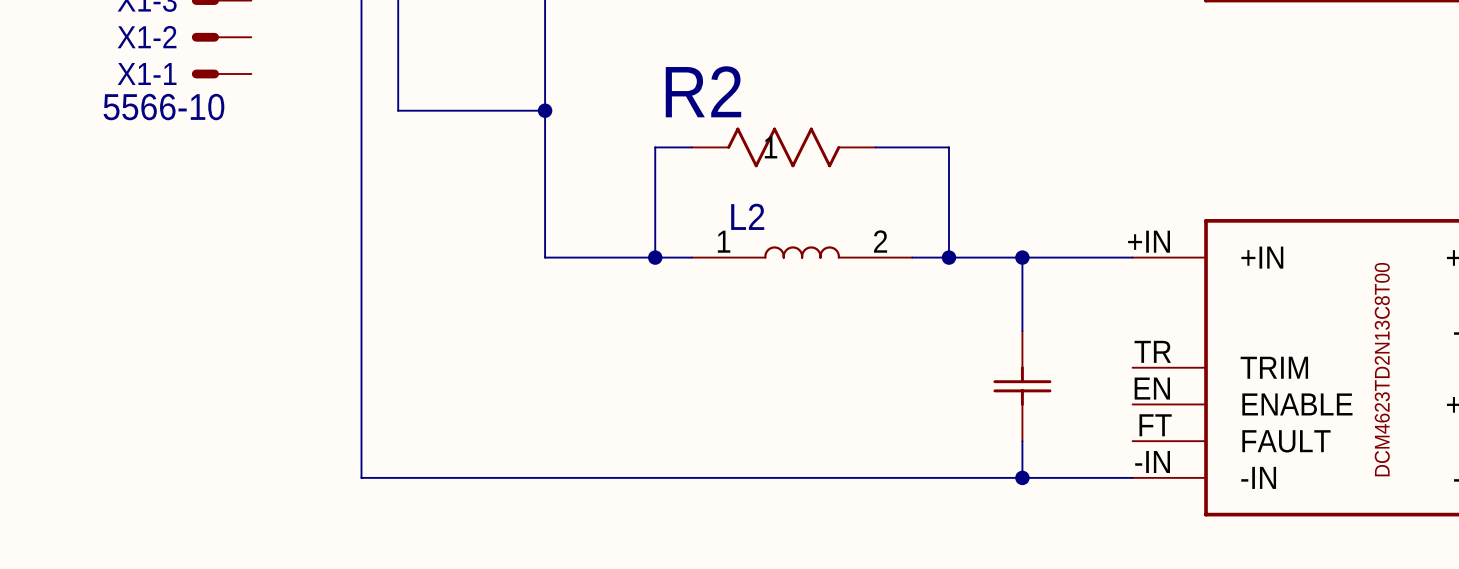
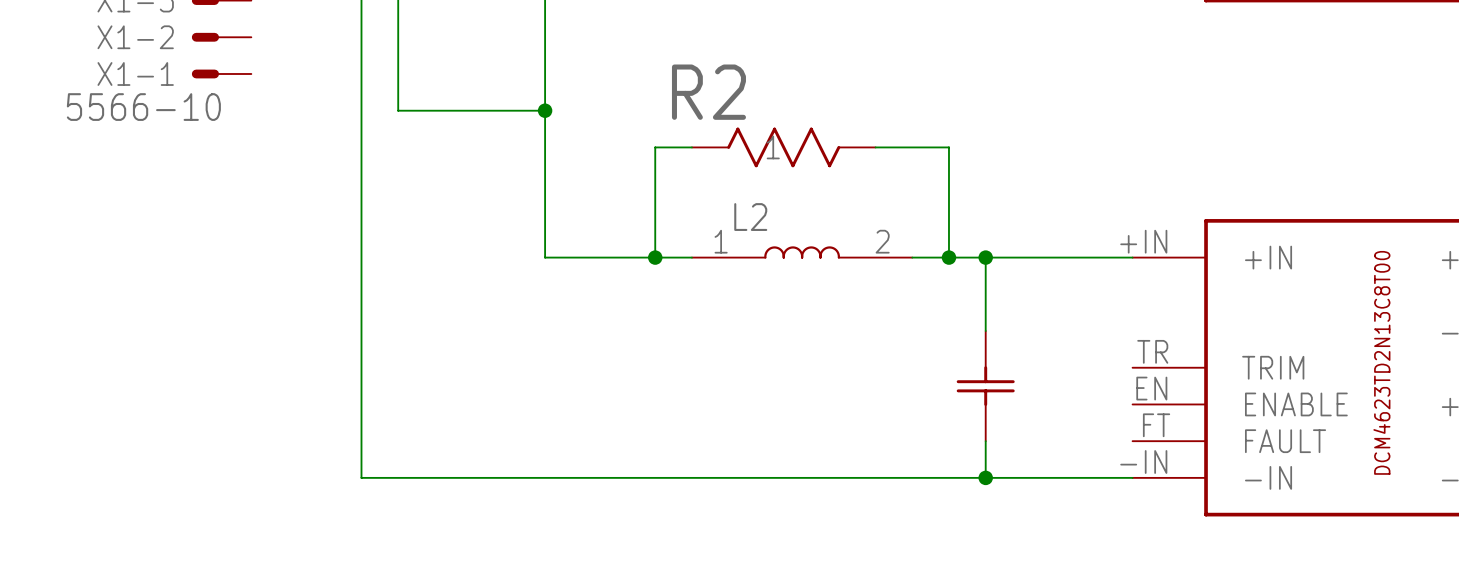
wire: (1022, 257) (1022, 331) -> (985, 257) (985, 331)
junction position: (1022, 257) -> (985, 257)
part position: (1022, 386) -> (985, 386)
wire: (1022, 441) (1022, 477) -> (985, 441) (985, 477)
junction position: (1022, 477) -> (985, 477)

